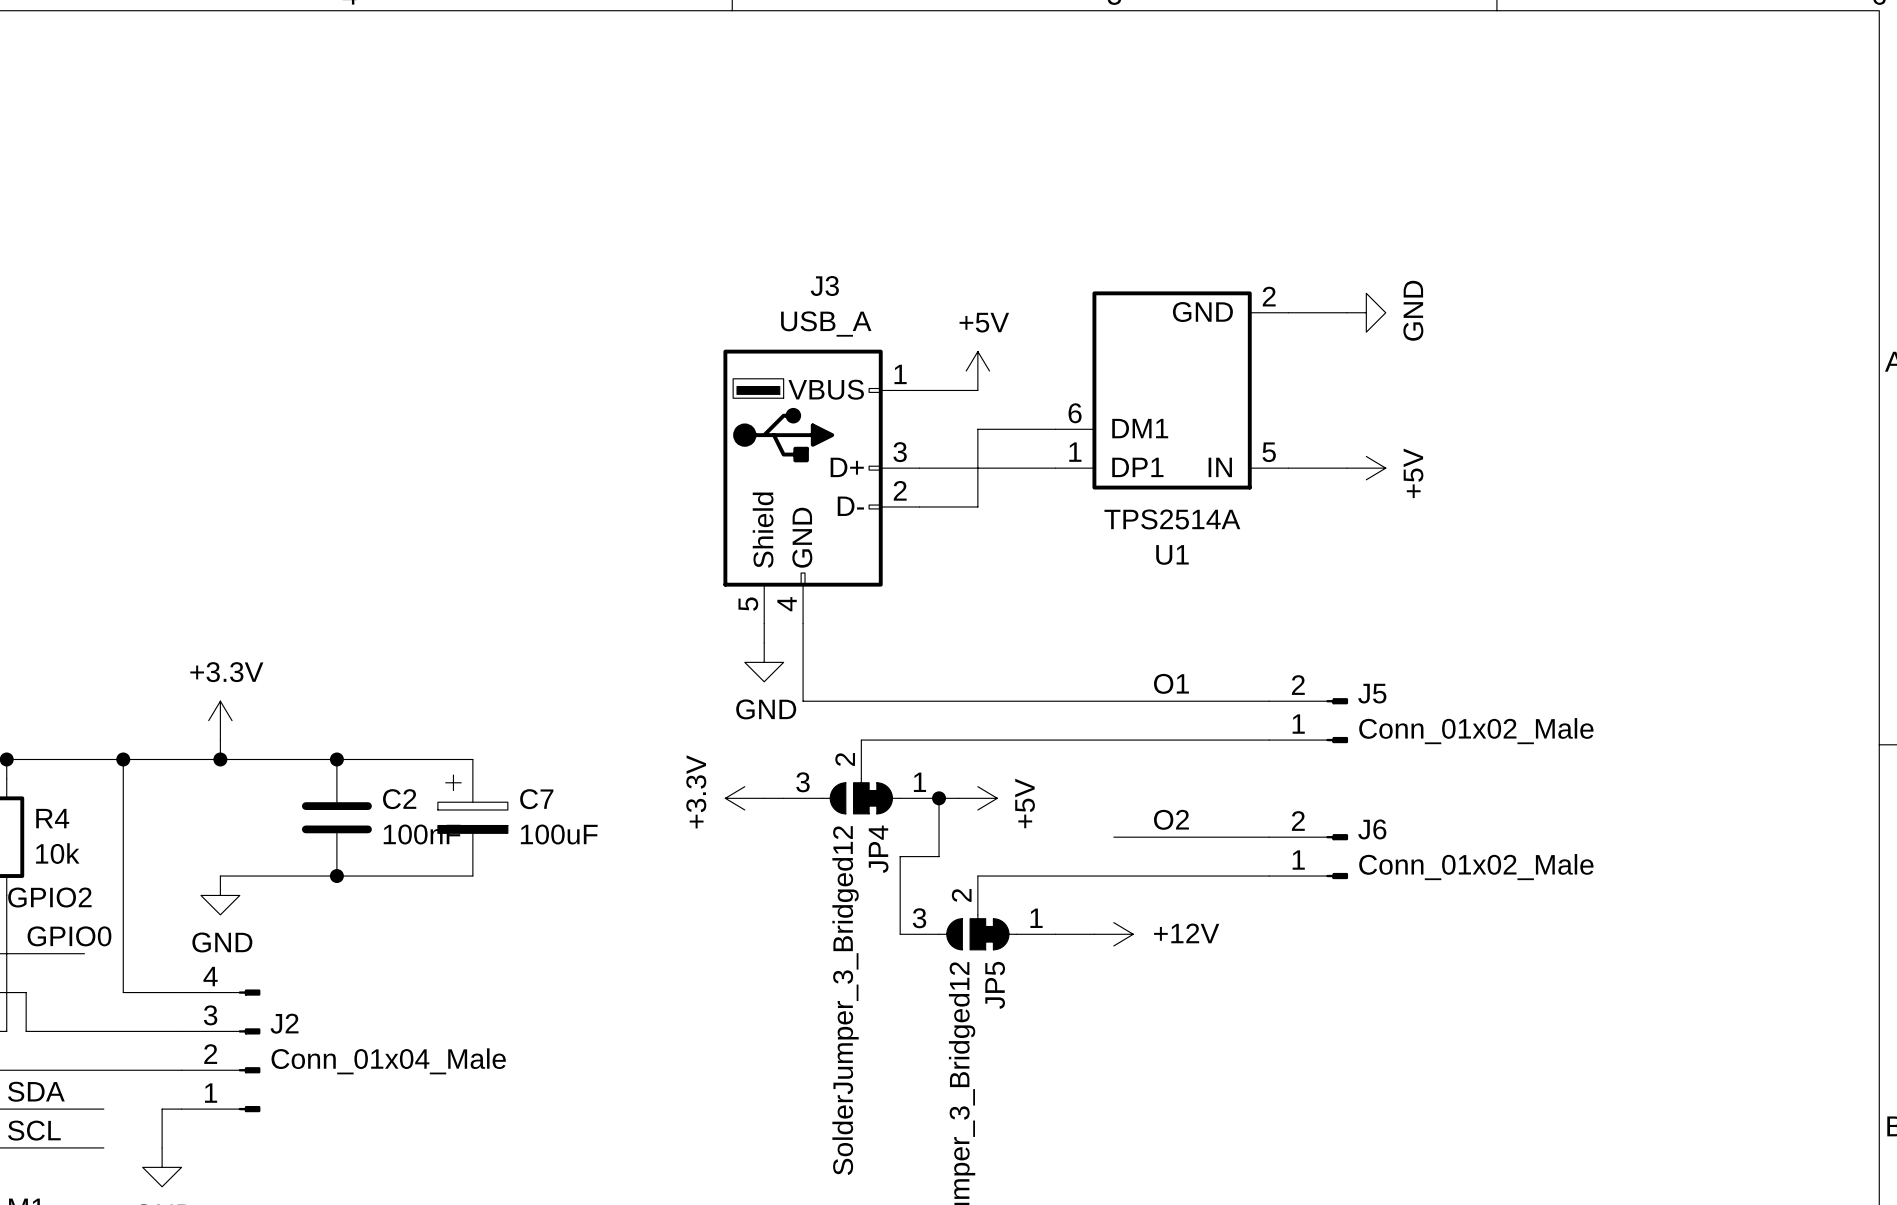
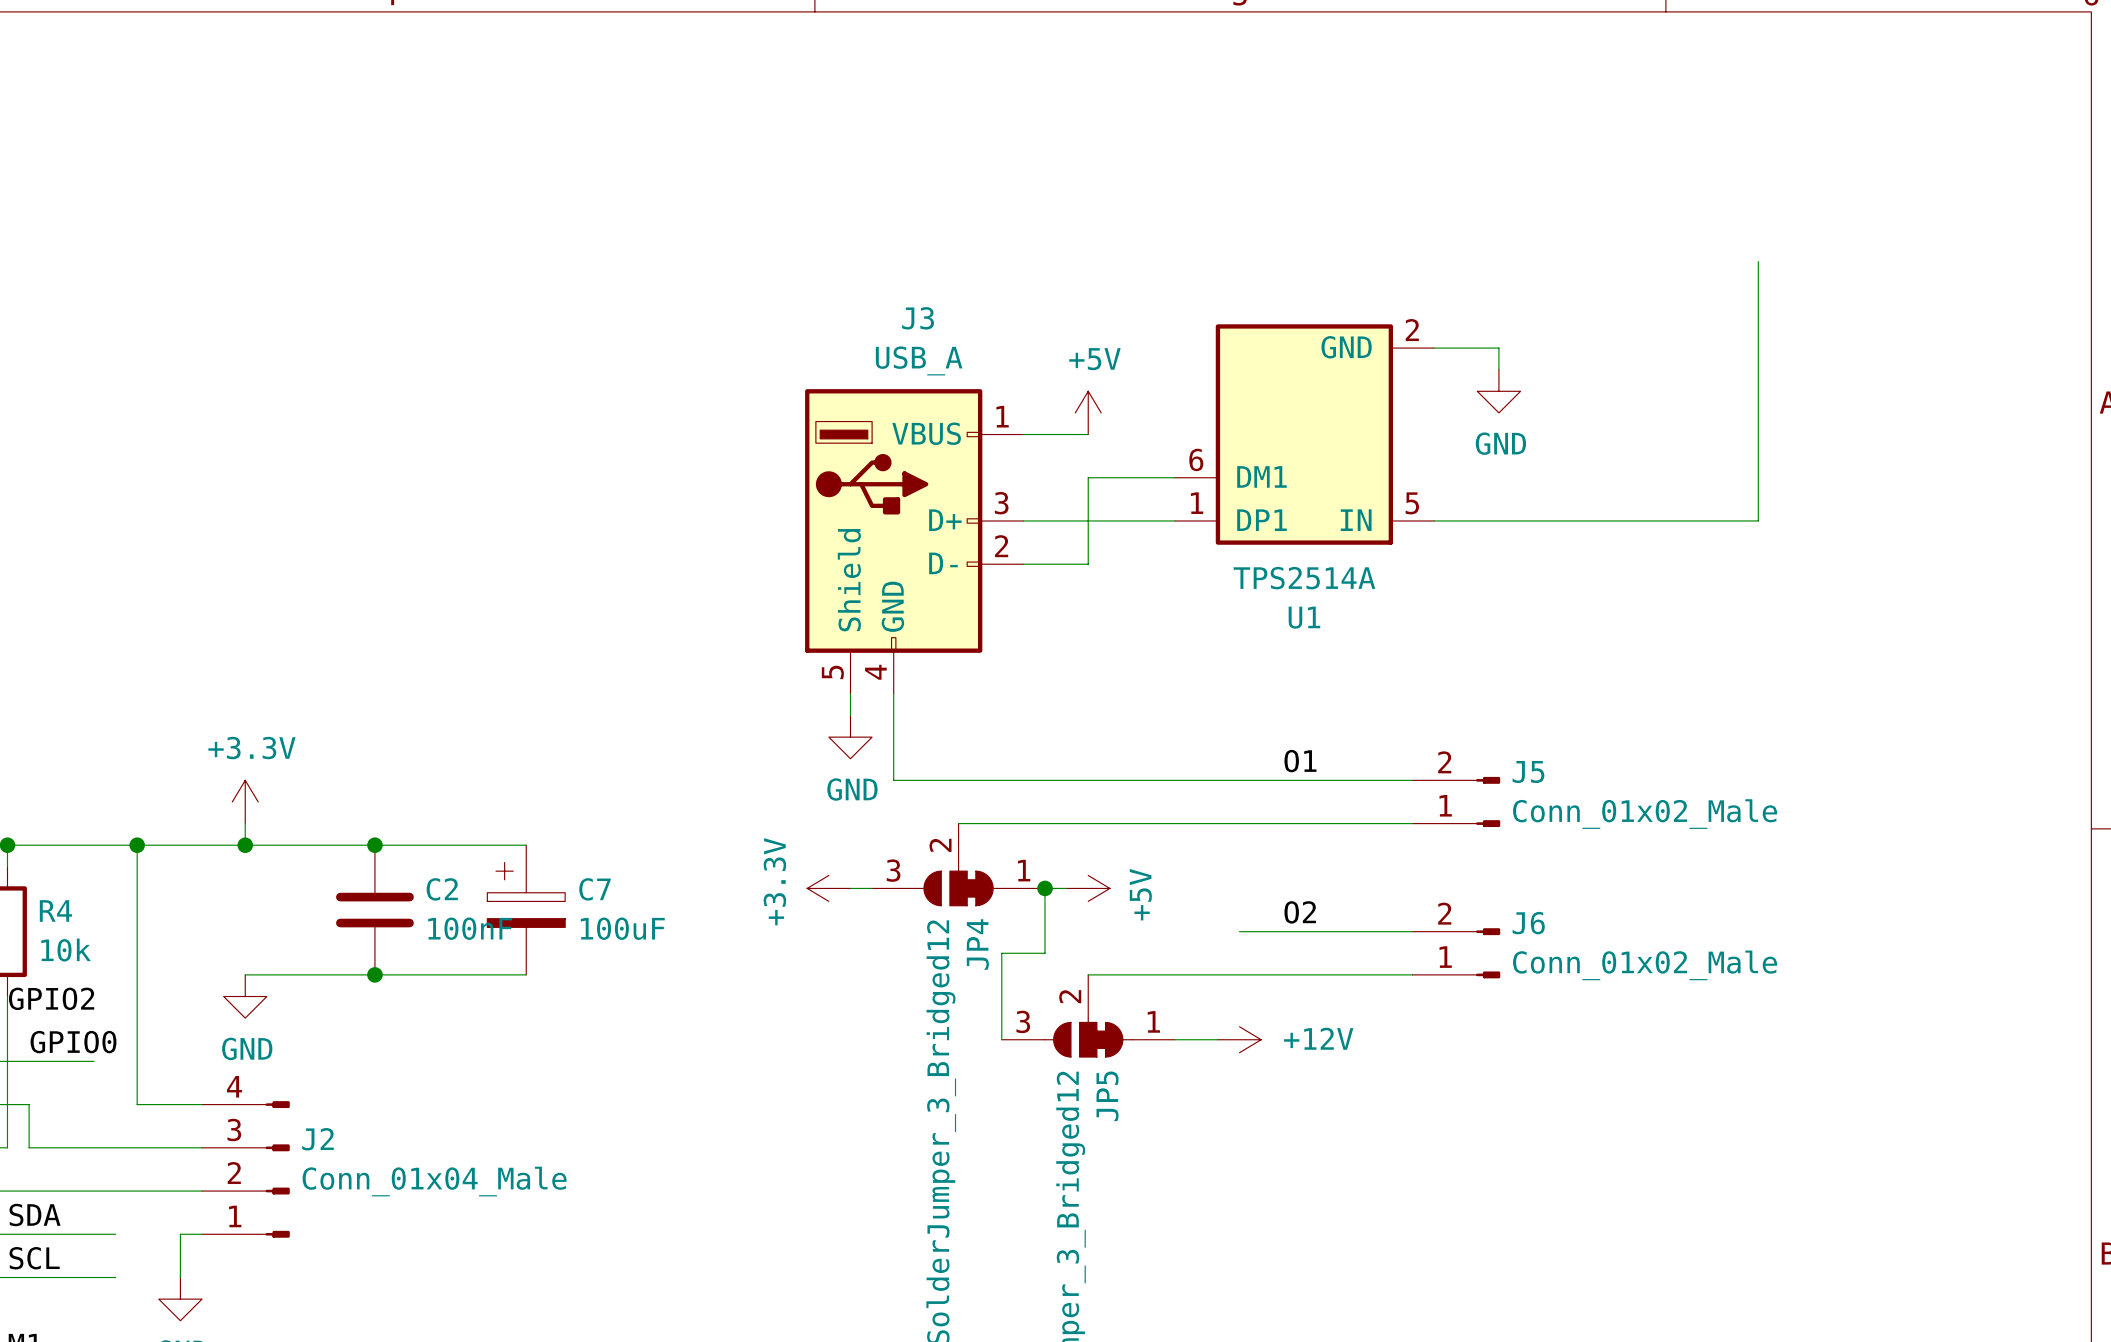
wire: none -> (1758, 261) (1758, 520) (1498, 520)
wire: none -> (1498, 348) (1498, 369)
power symbol rotation: 0° (1366, 312) -> 90° clockwise (1498, 391)
power symbol position: GND (1366, 312) -> GND (1498, 391)
power symbol: +5V (1366, 468) -> none

